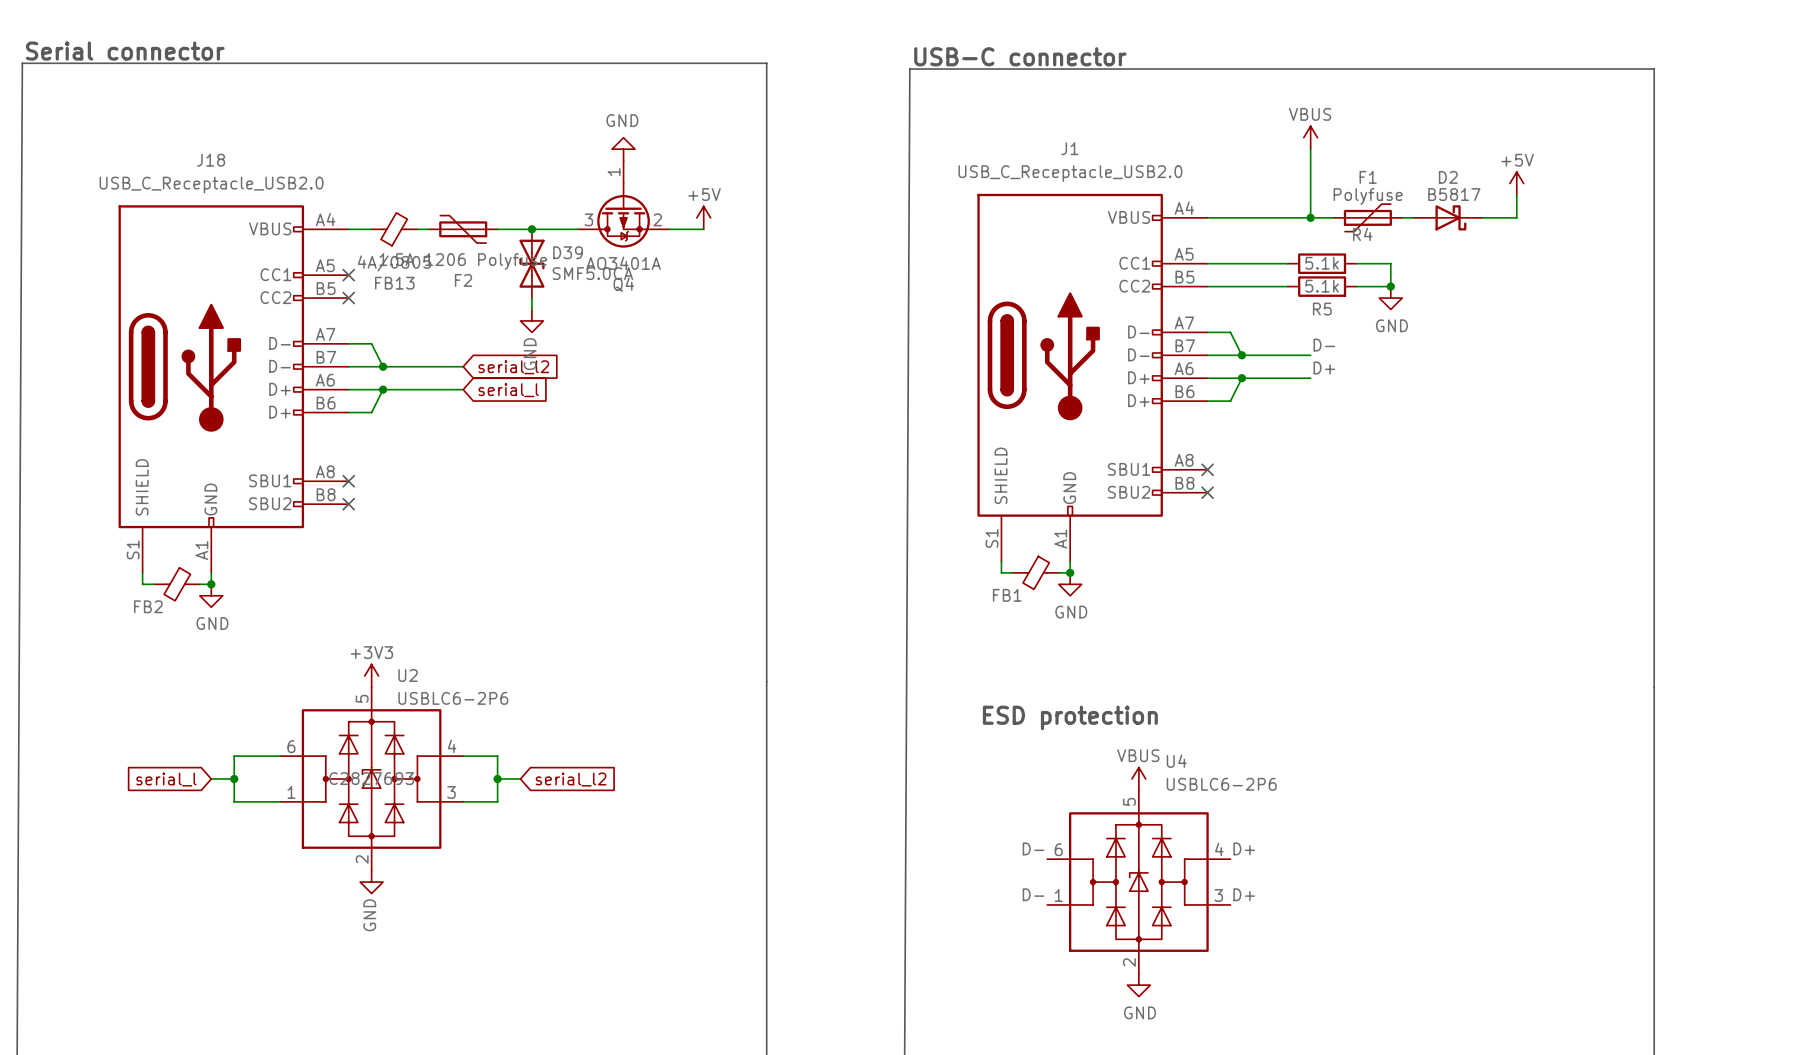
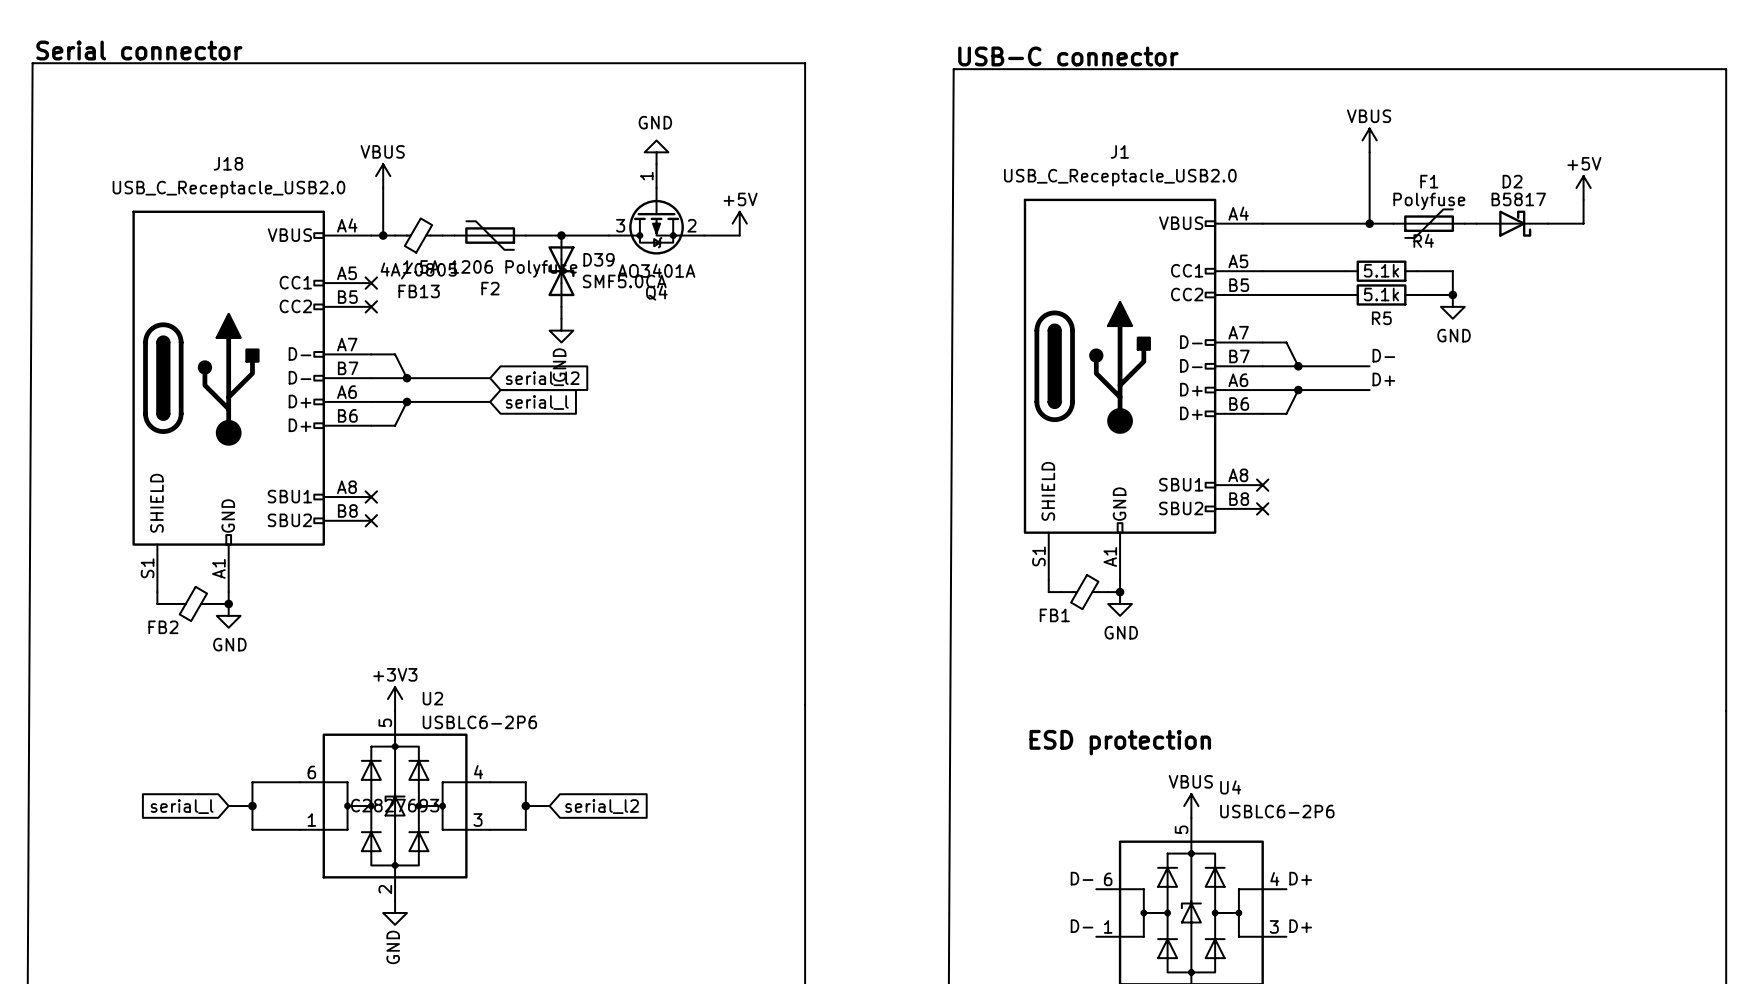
power symbol: none -> VBUS (383, 176)
wire: none -> (383, 188) (383, 235)
junction: none -> (383, 235)

